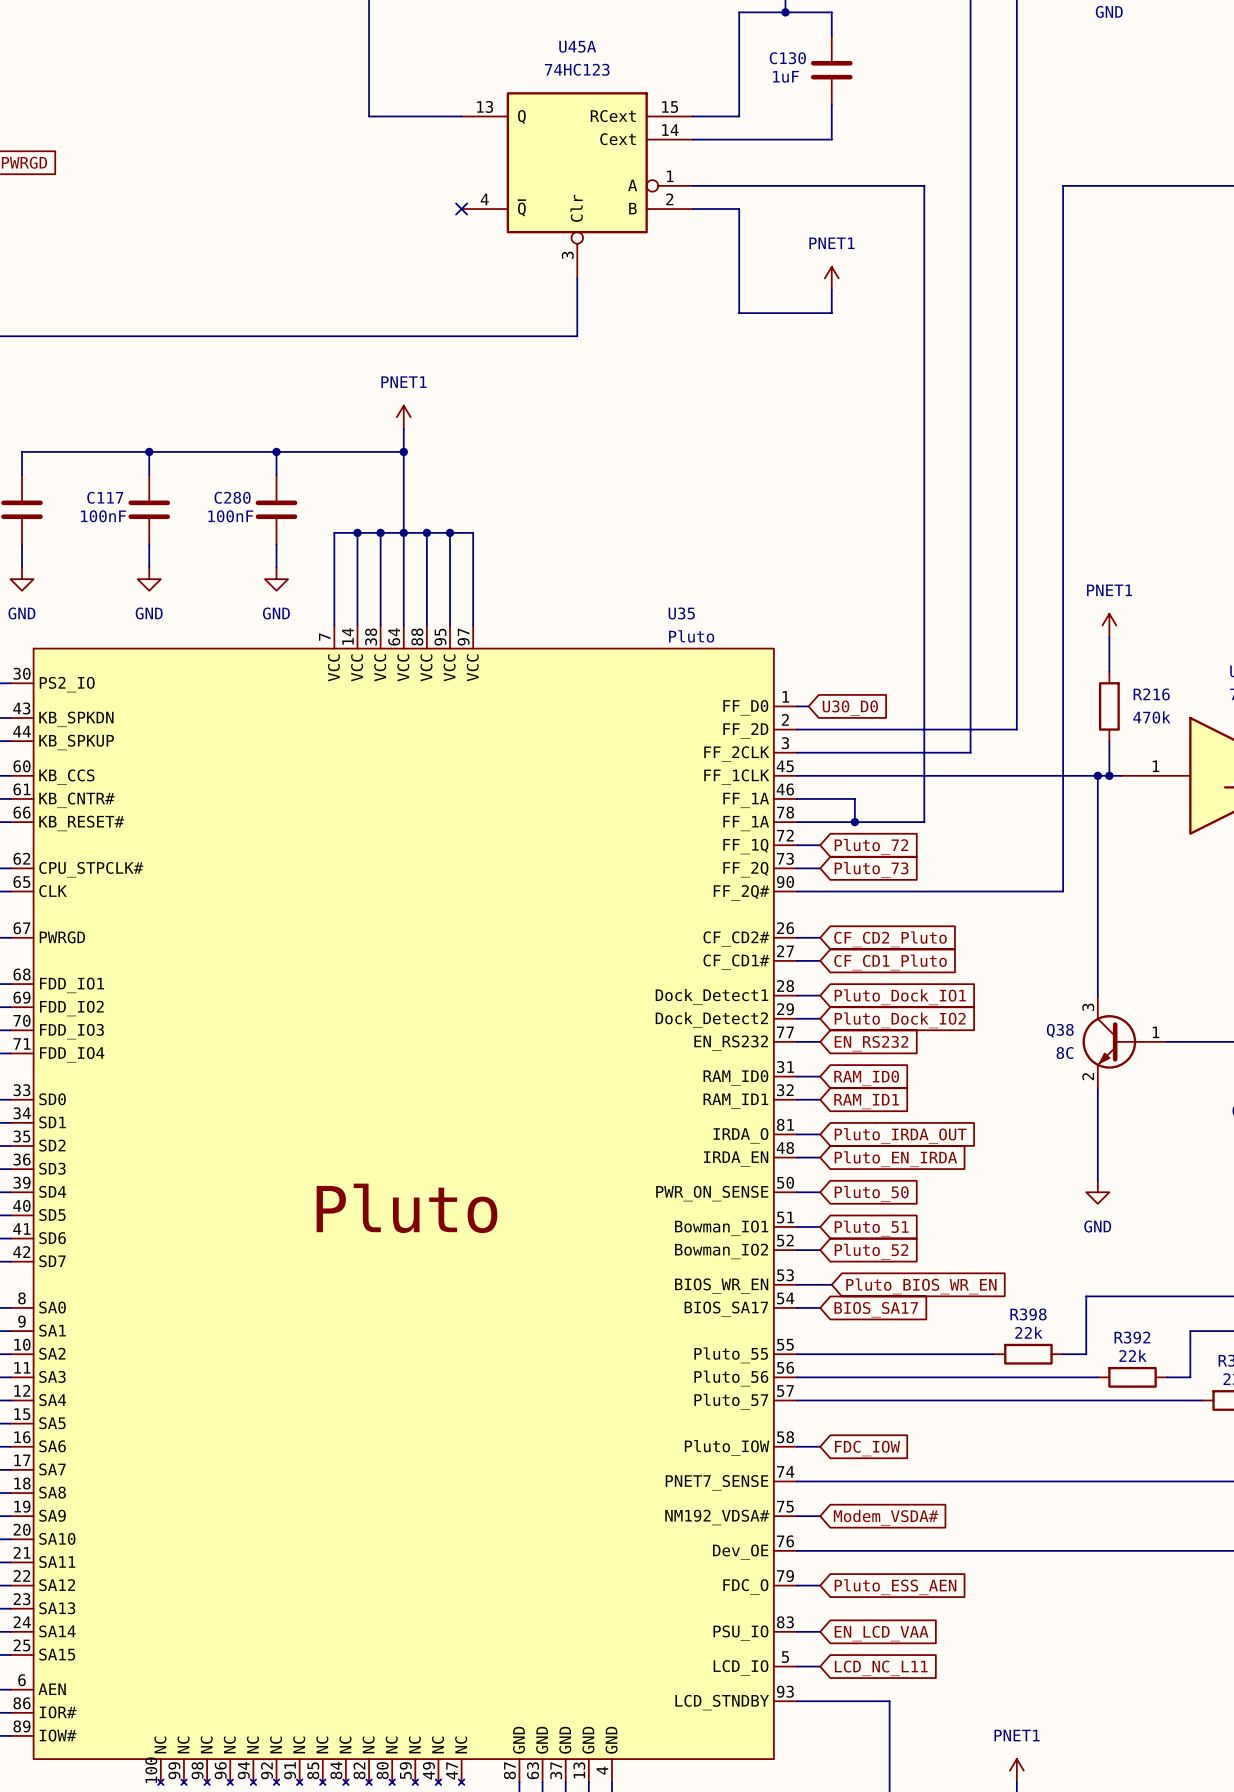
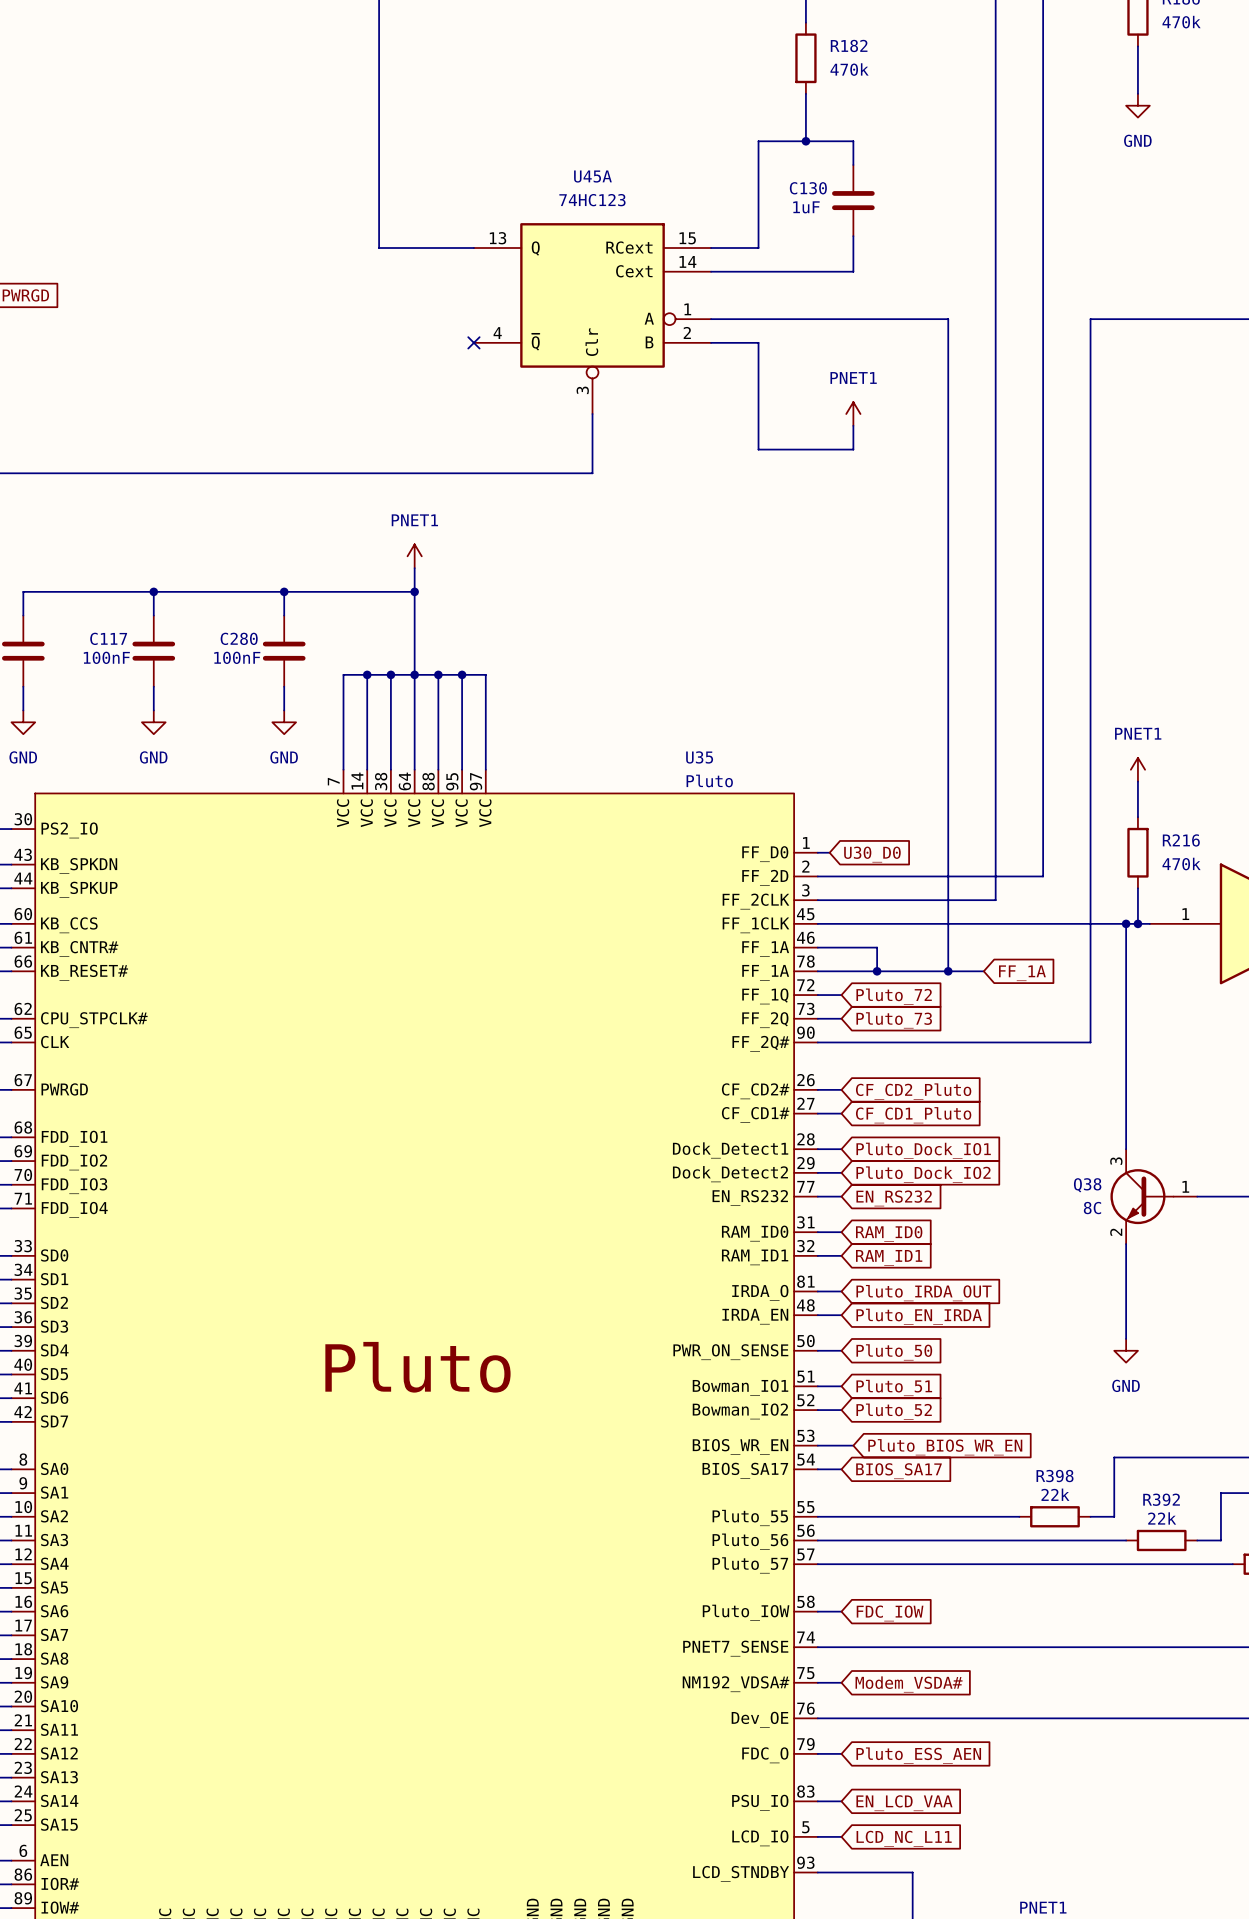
wire: none -> (948, 971) (983, 971)
junction: none -> (948, 971)
global label: none -> FF_1A (1022, 973)

